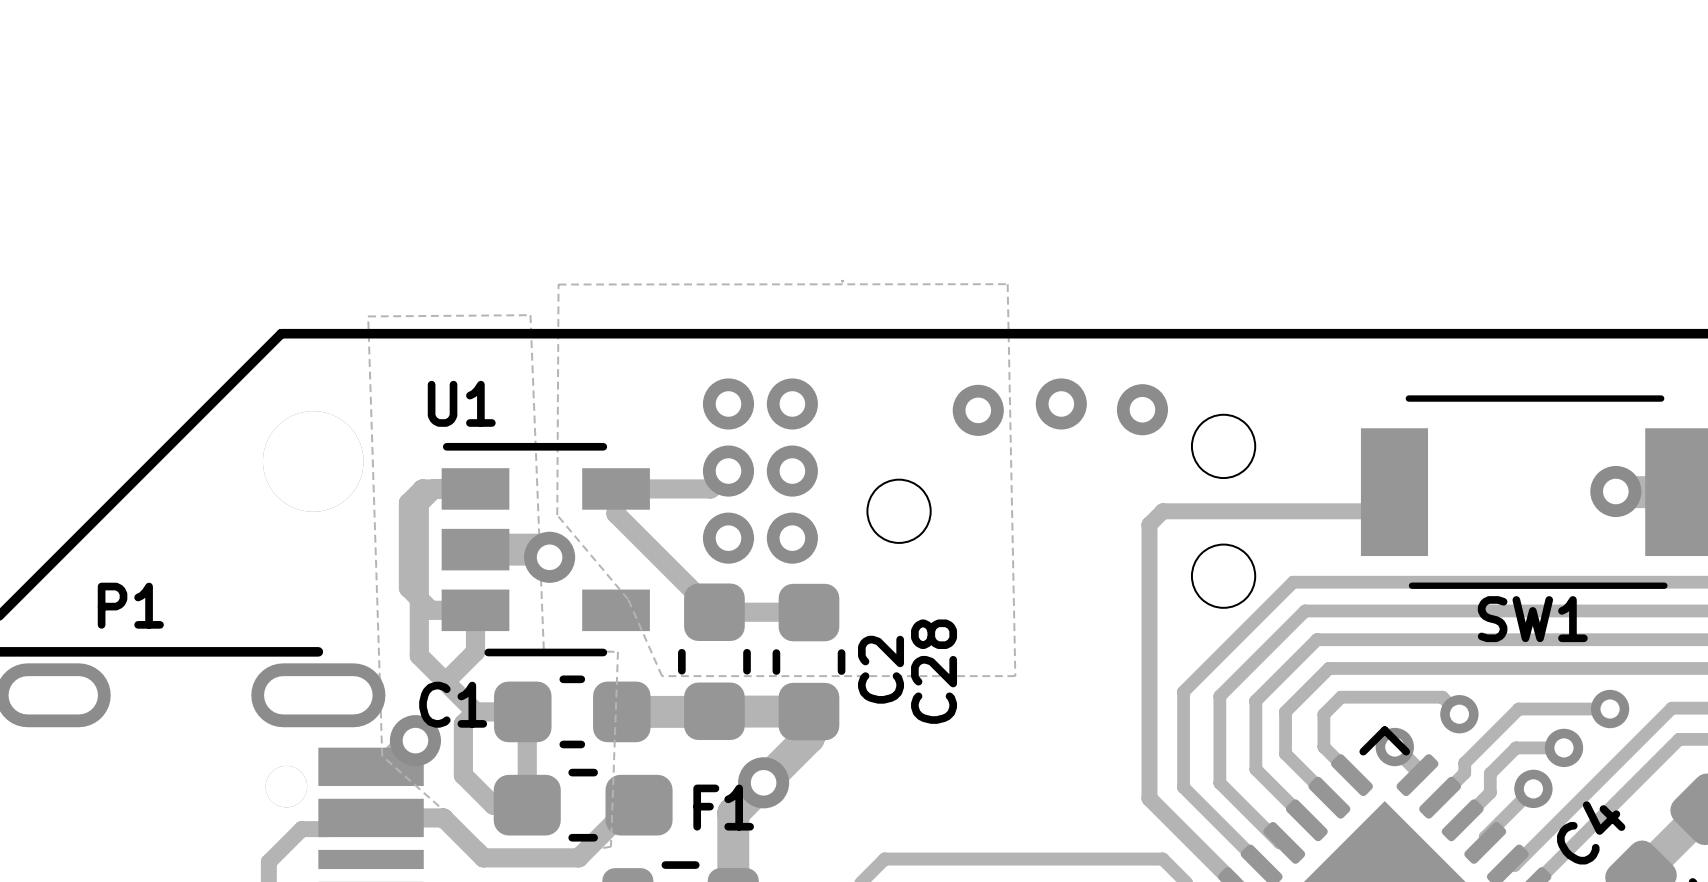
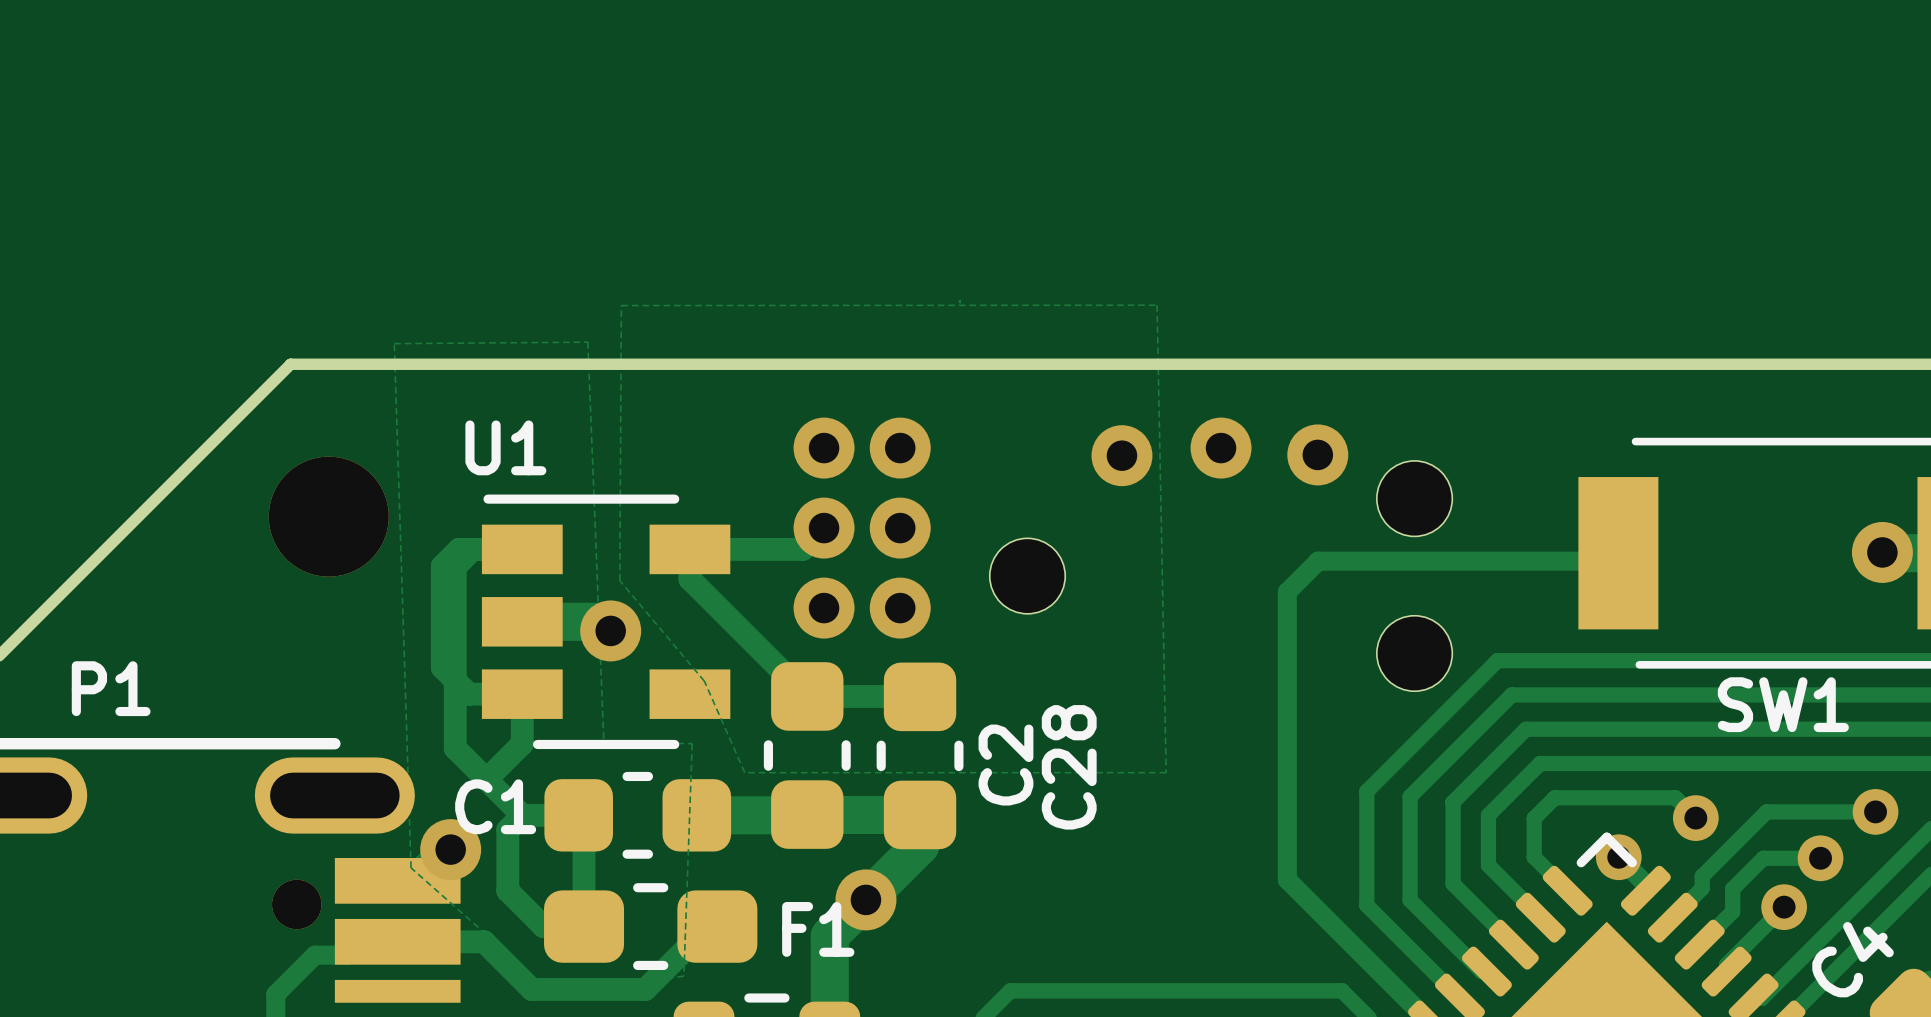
track: (1387, 498) (1375, 511) (1162, 511) (1149, 524) (1149, 798) -> (1610, 561) (1318, 561) (1287, 592) (1287, 879) (1326, 918)

